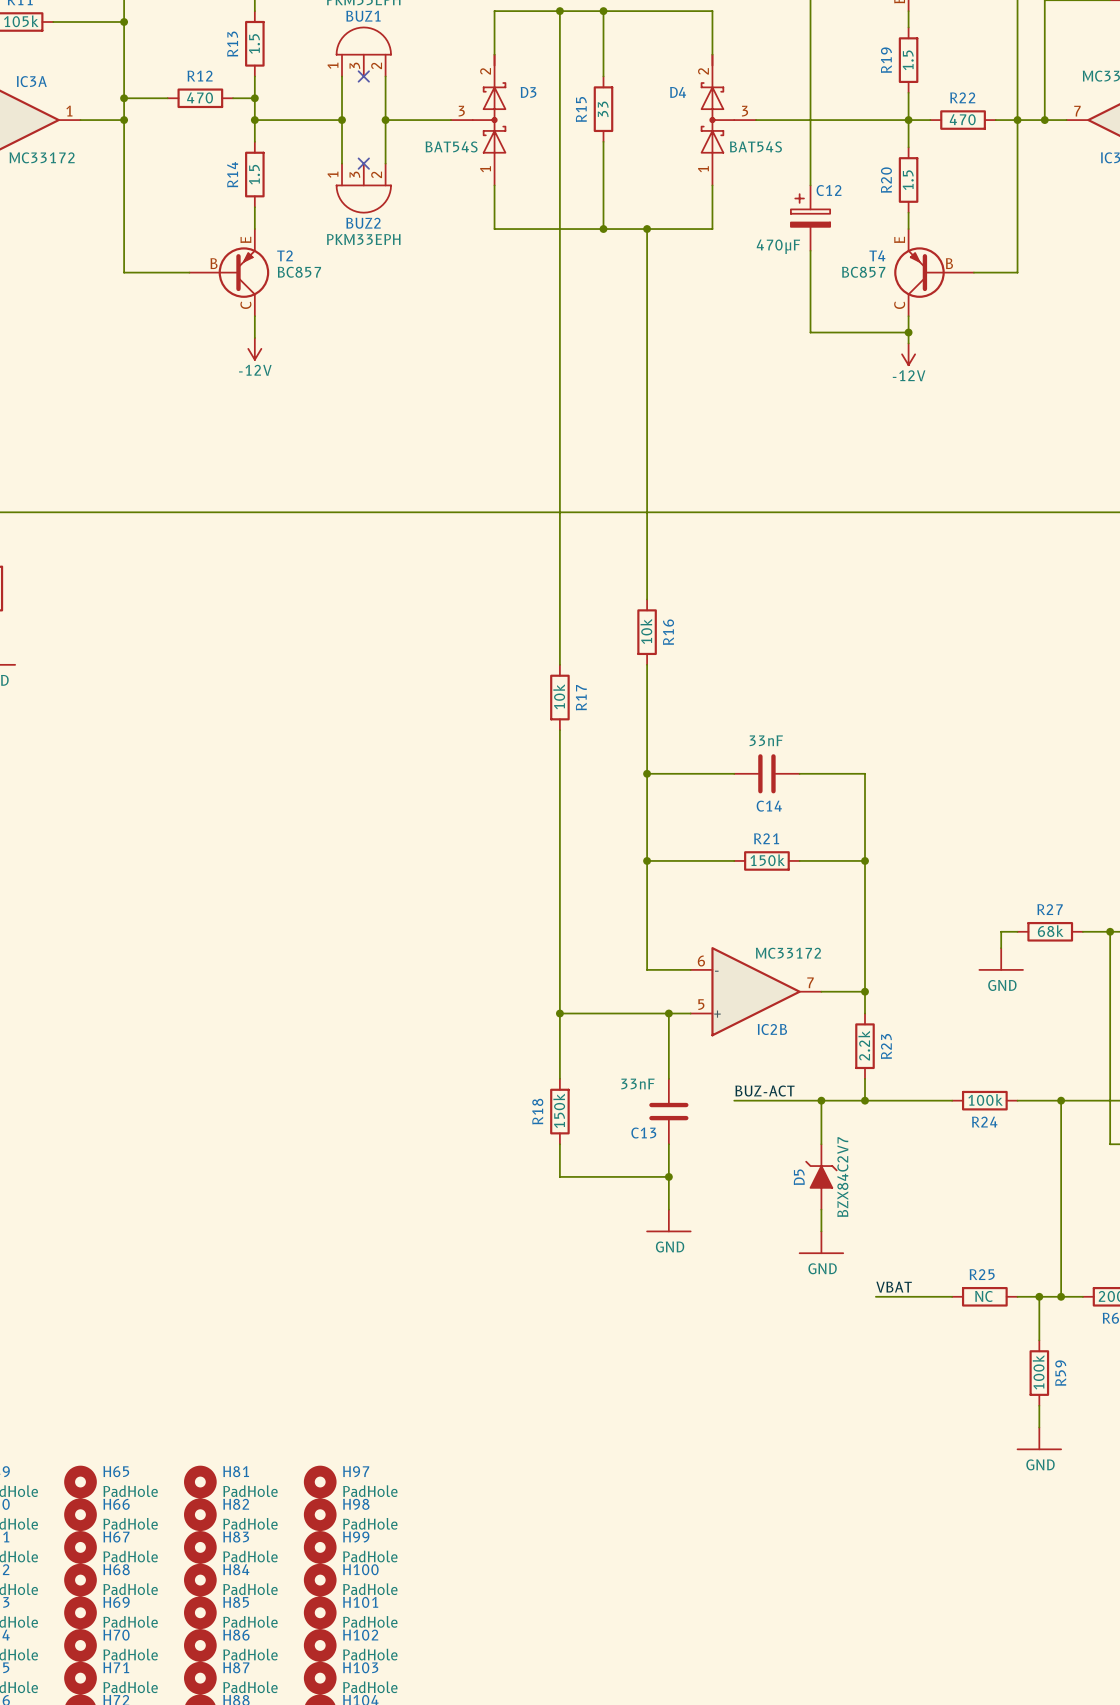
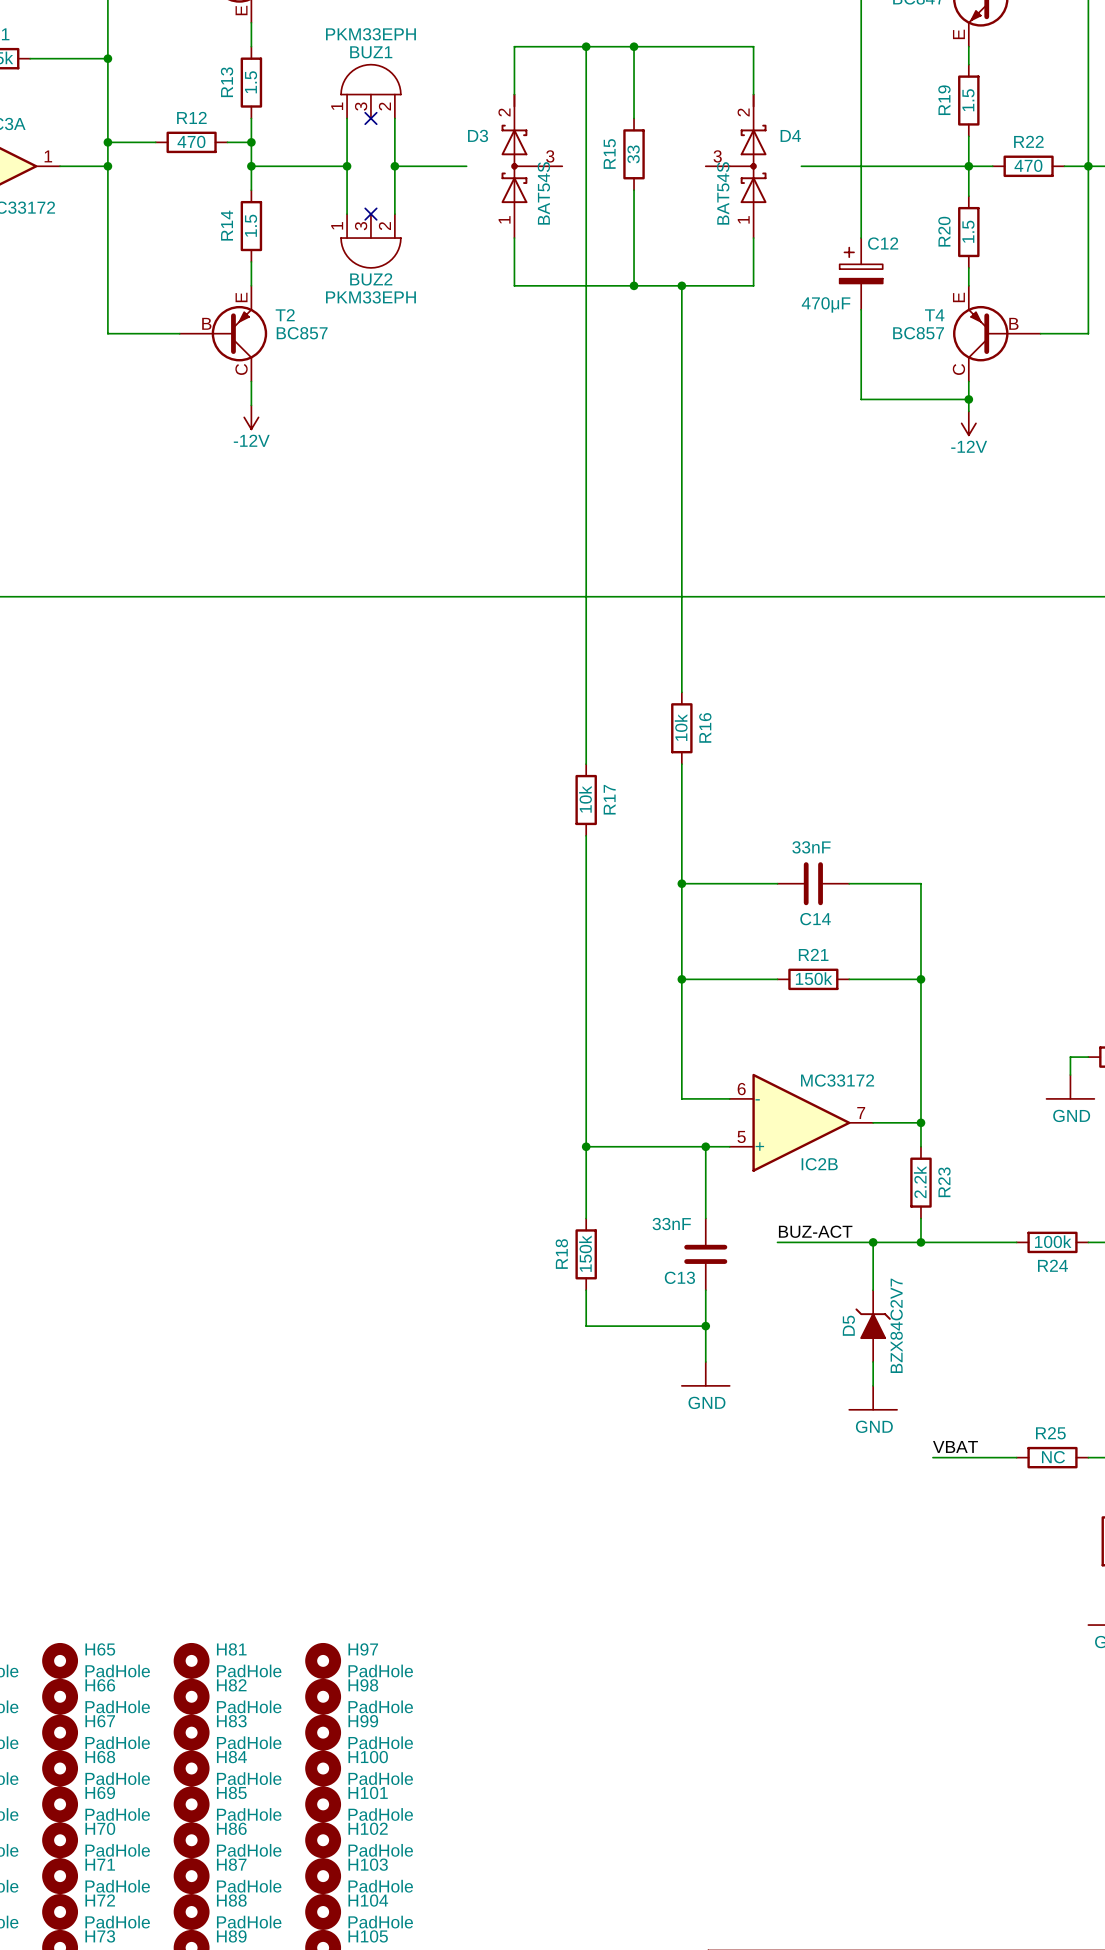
D3 flip: as is (489, 104) -> left-right (519, 148)
D4 flip: as is (717, 104) -> left-right (748, 148)
D3 value position: BAT54S (451, 146) -> BAT54S (543, 193)
D4 value position: BAT54S (755, 146) -> BAT54S (723, 193)

